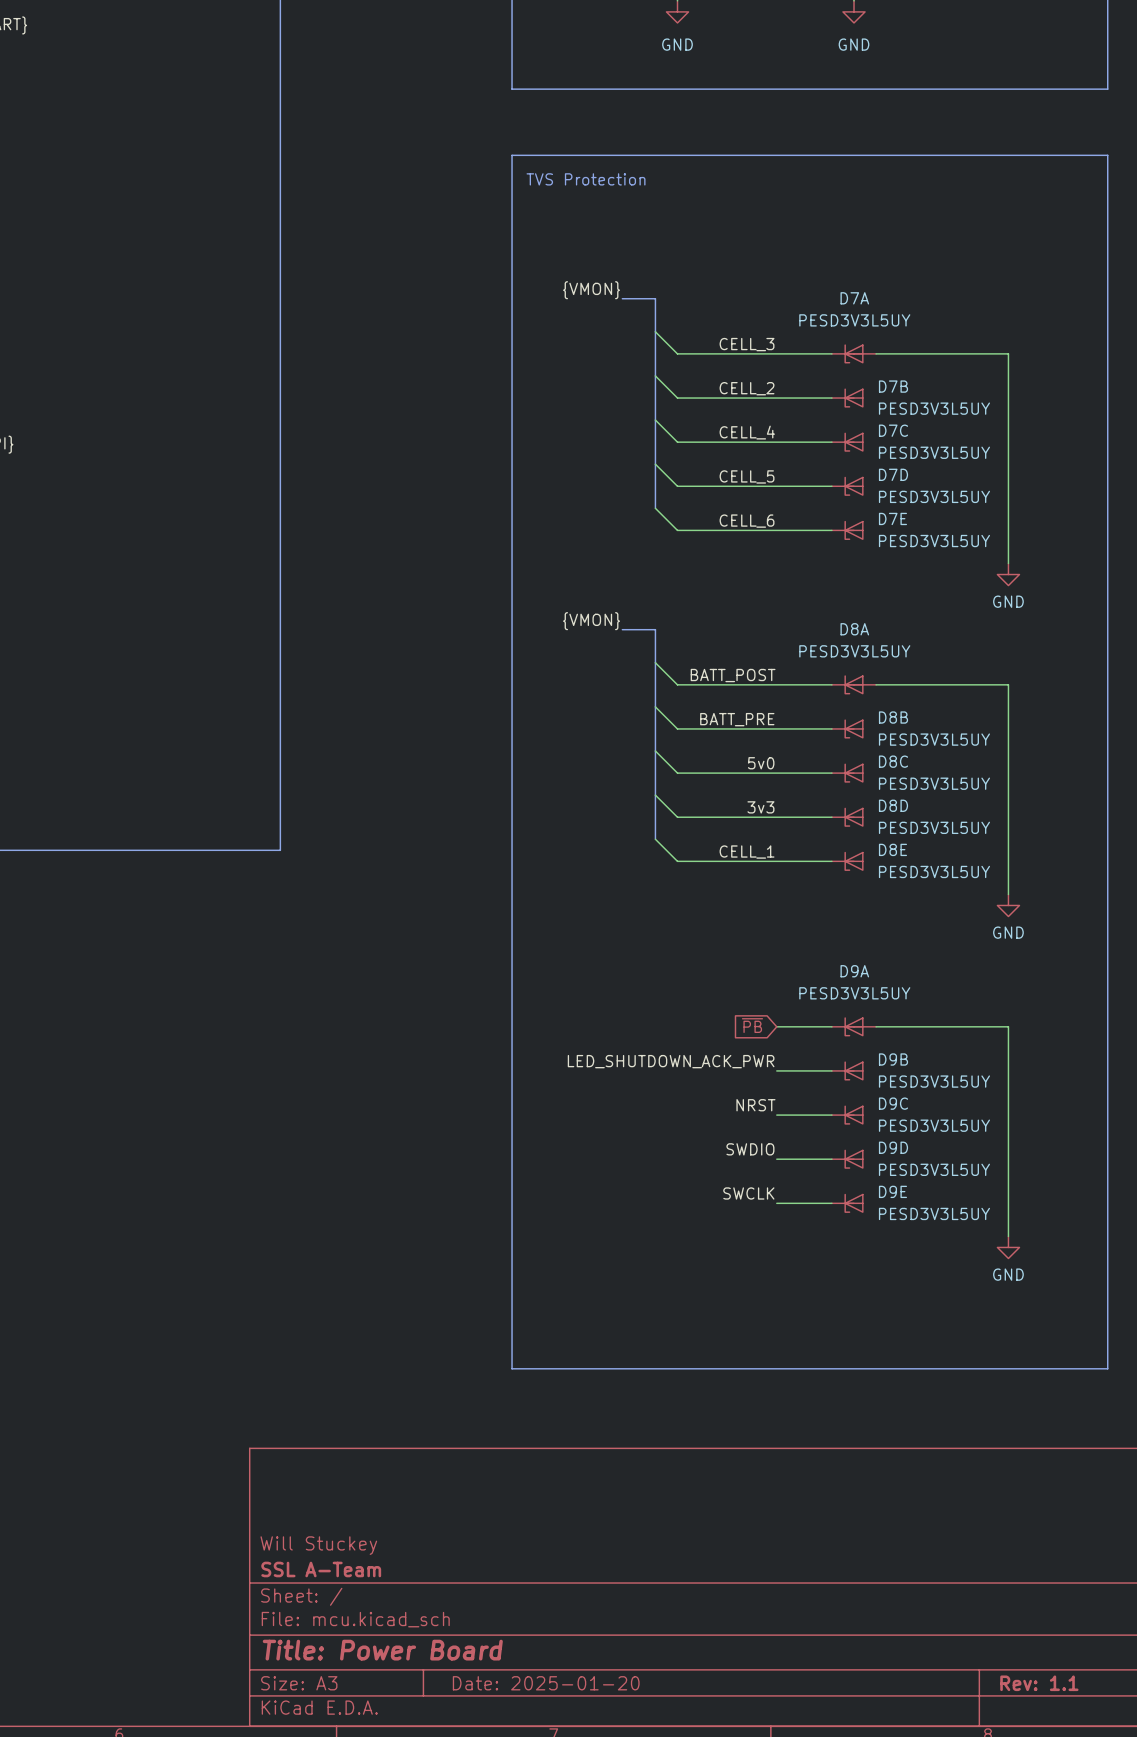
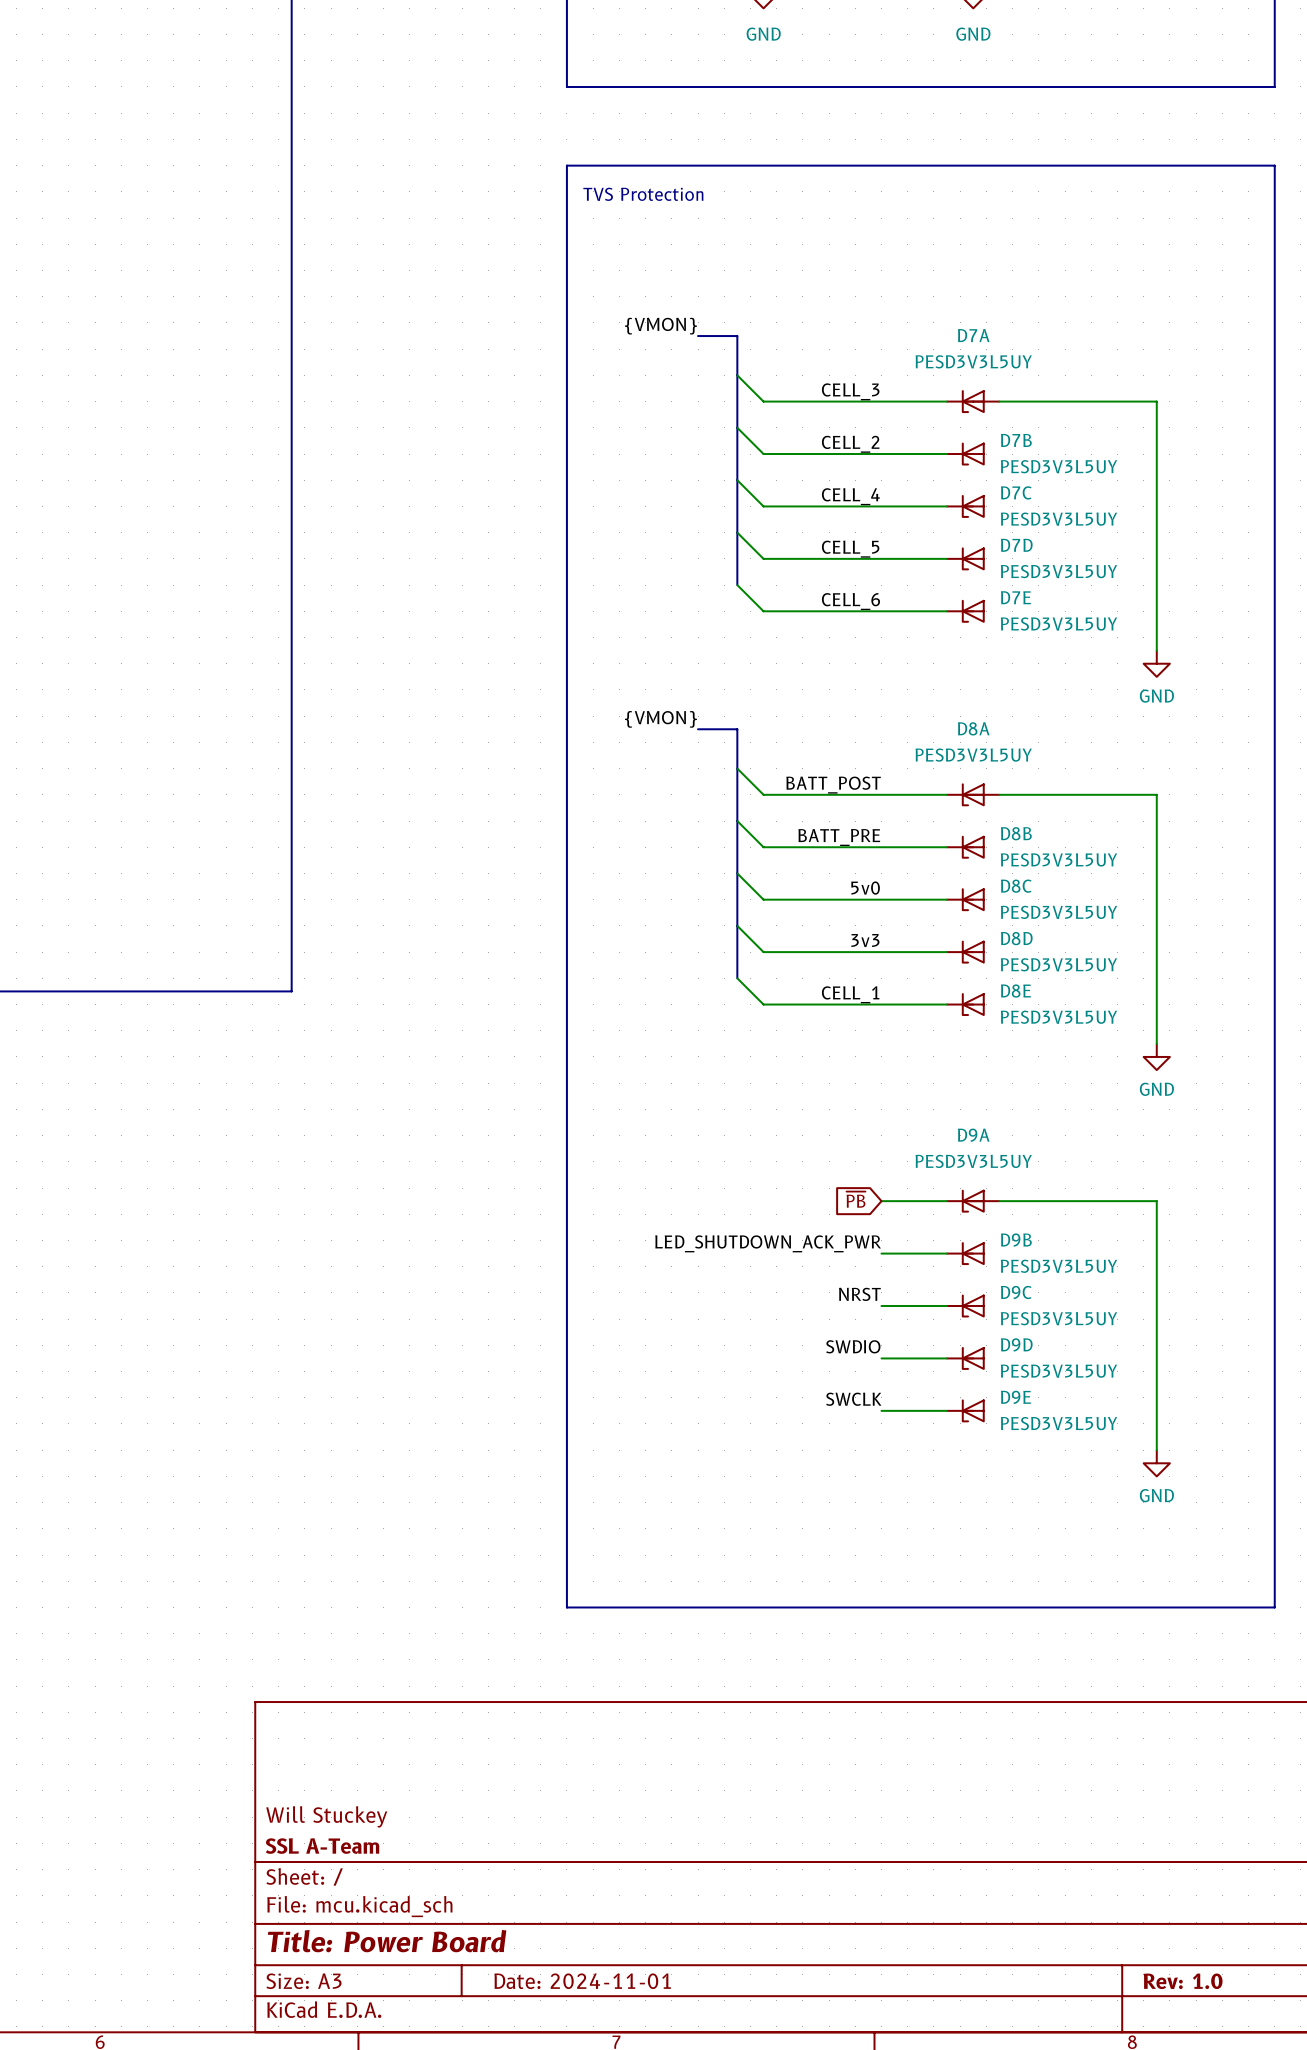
title block: Date: 2025-01-20 (546, 1683) -> Date: 2024-11-01 (582, 1981)
title block: Rev: 1.1 (1039, 1683) -> Rev: 1.0 (1183, 1981)

